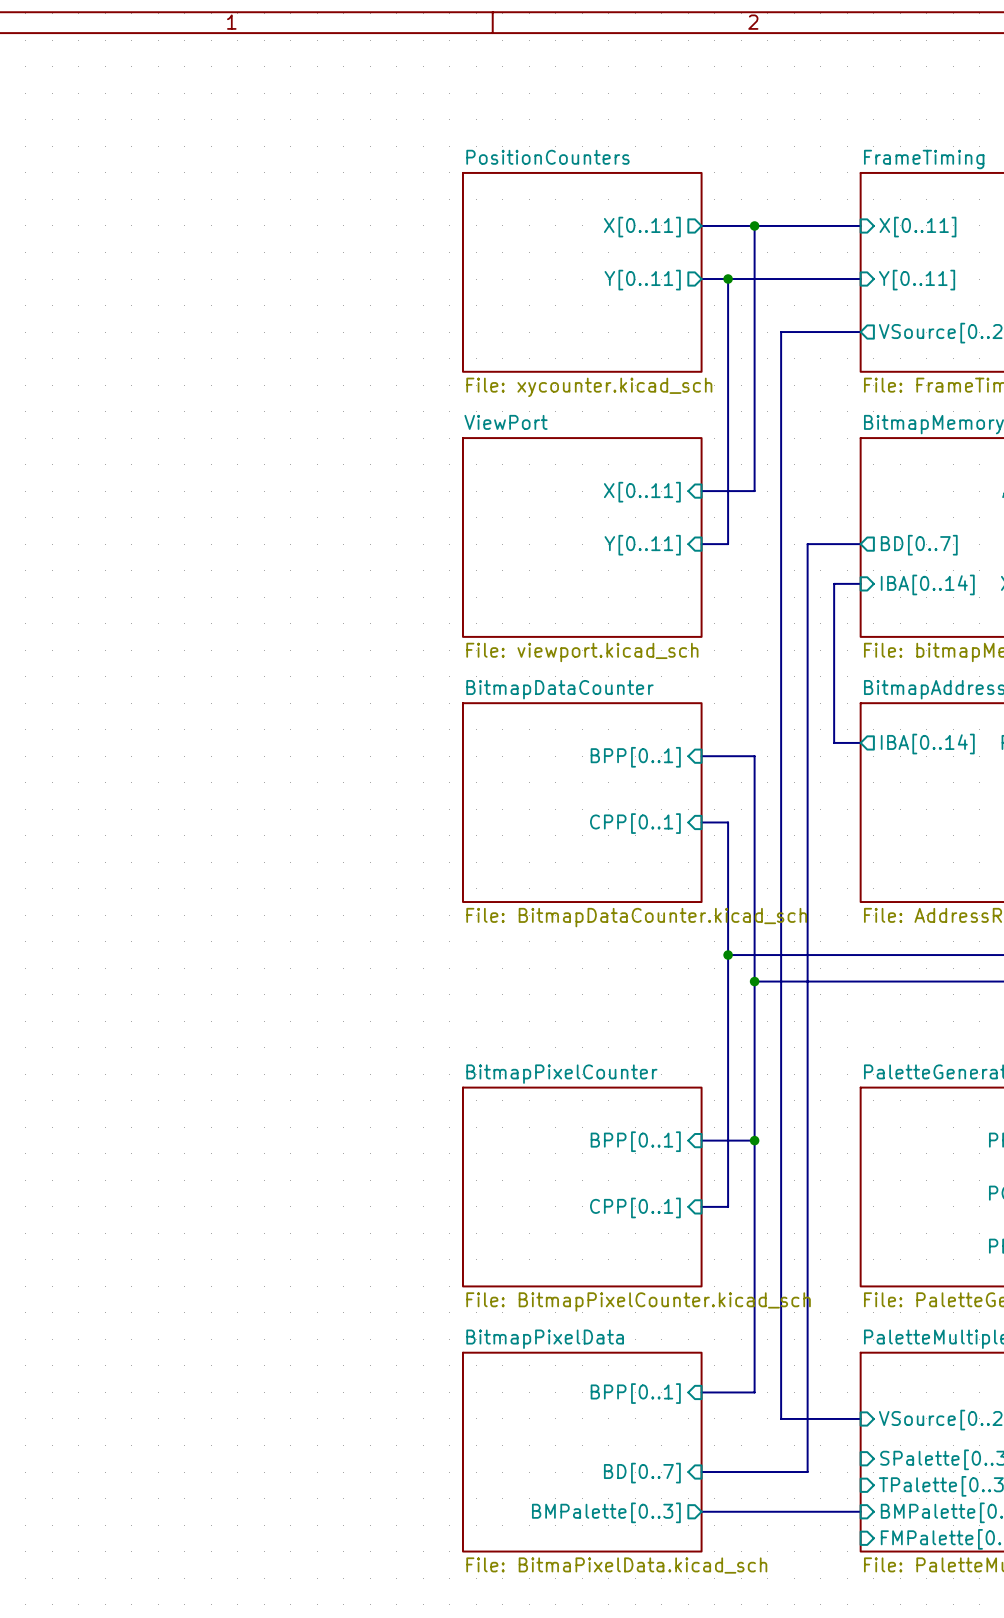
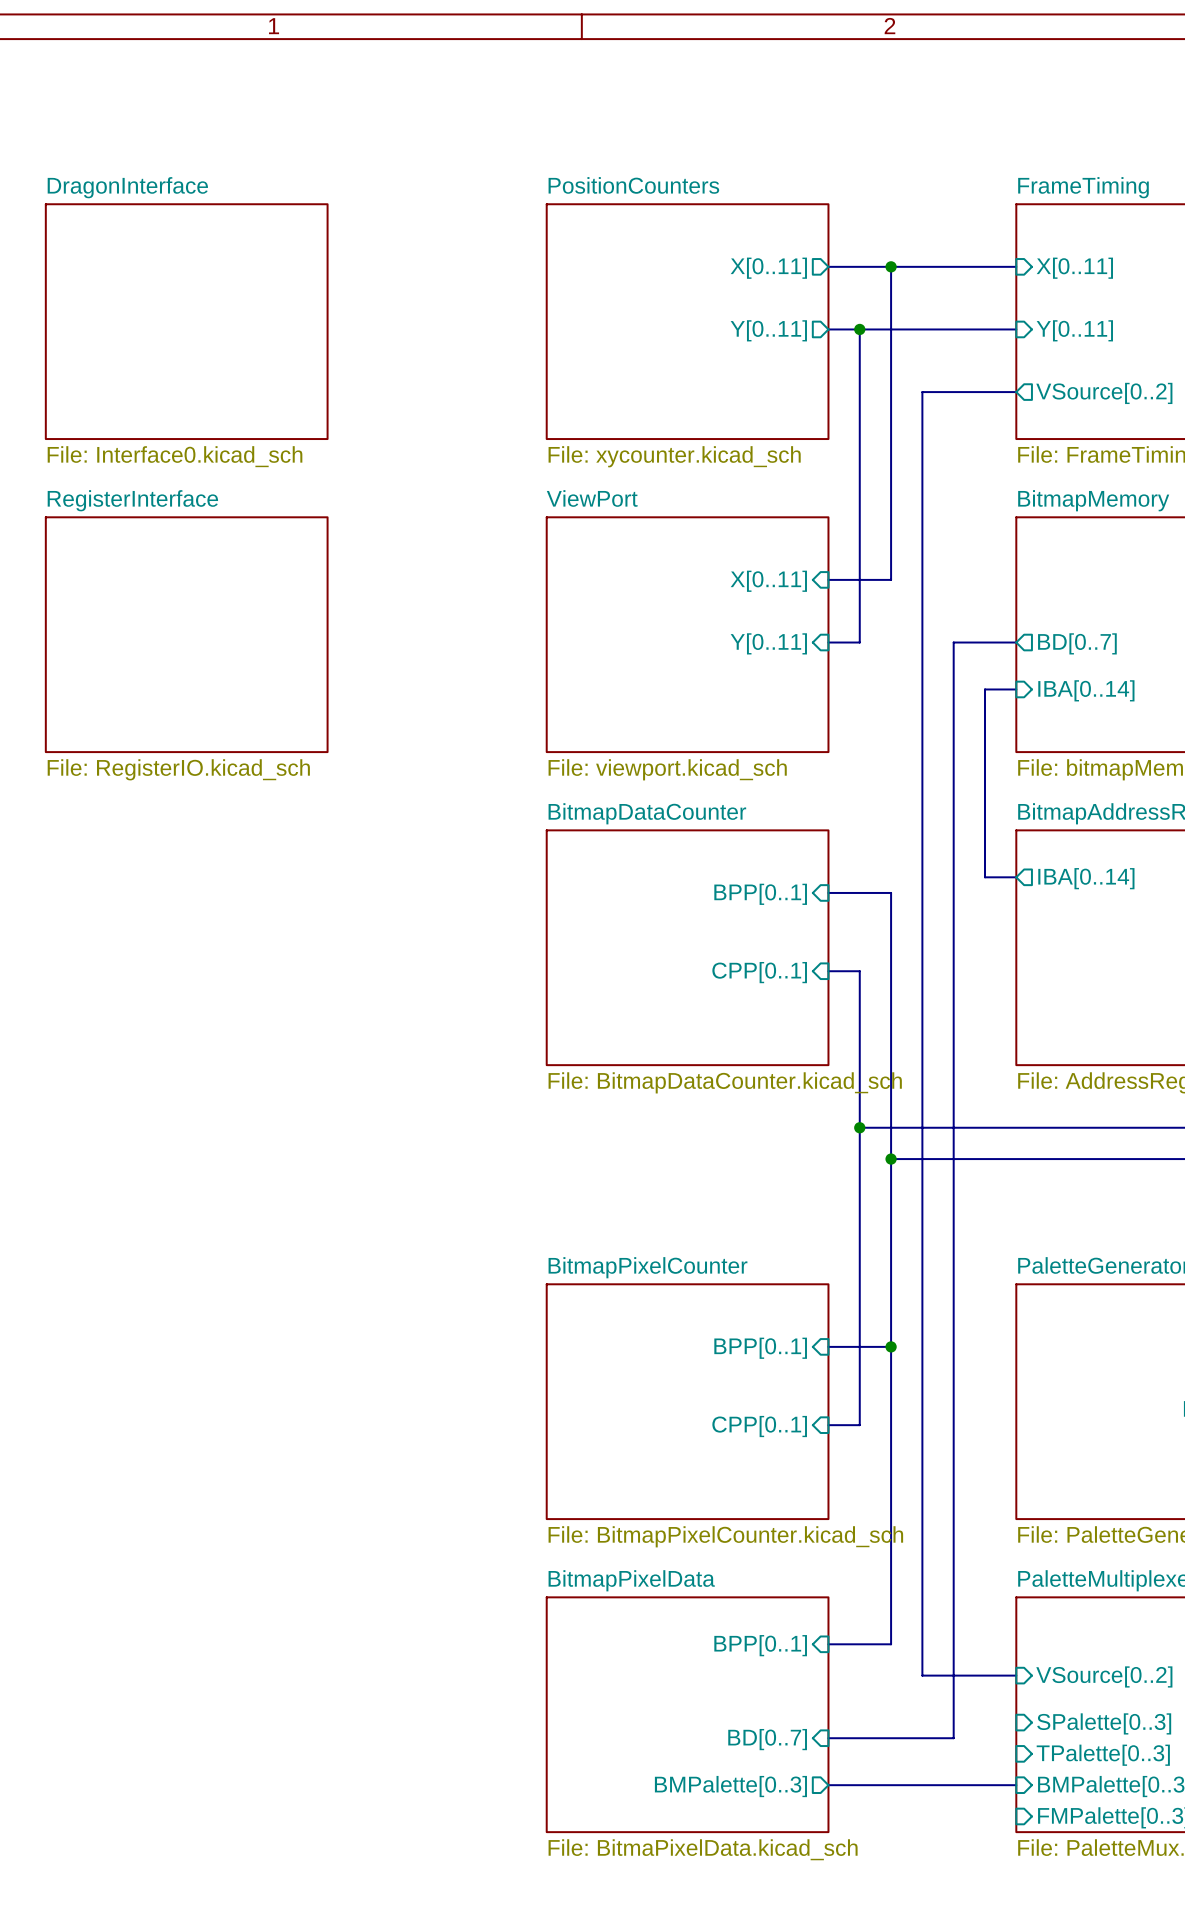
sheet DragonInterface: none -> File: Interface0.kicad_sch (186, 321)
sheet RegisterInterface: none -> File: RegisterIO.kicad_sch (186, 634)

